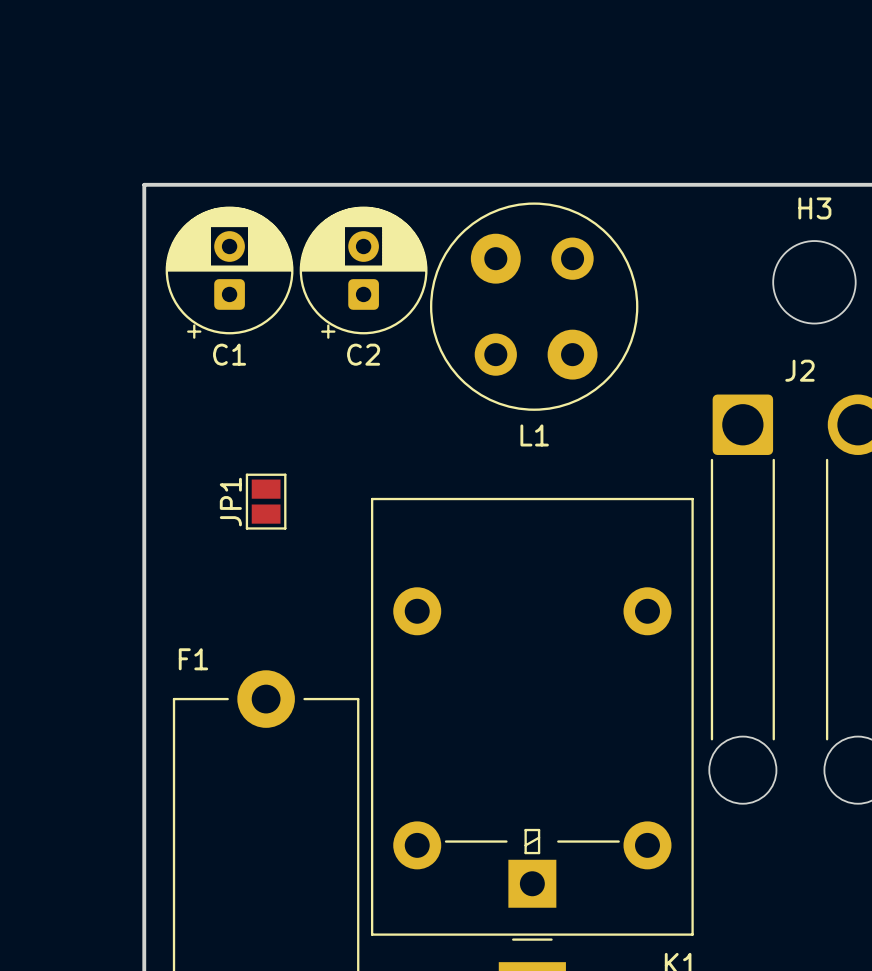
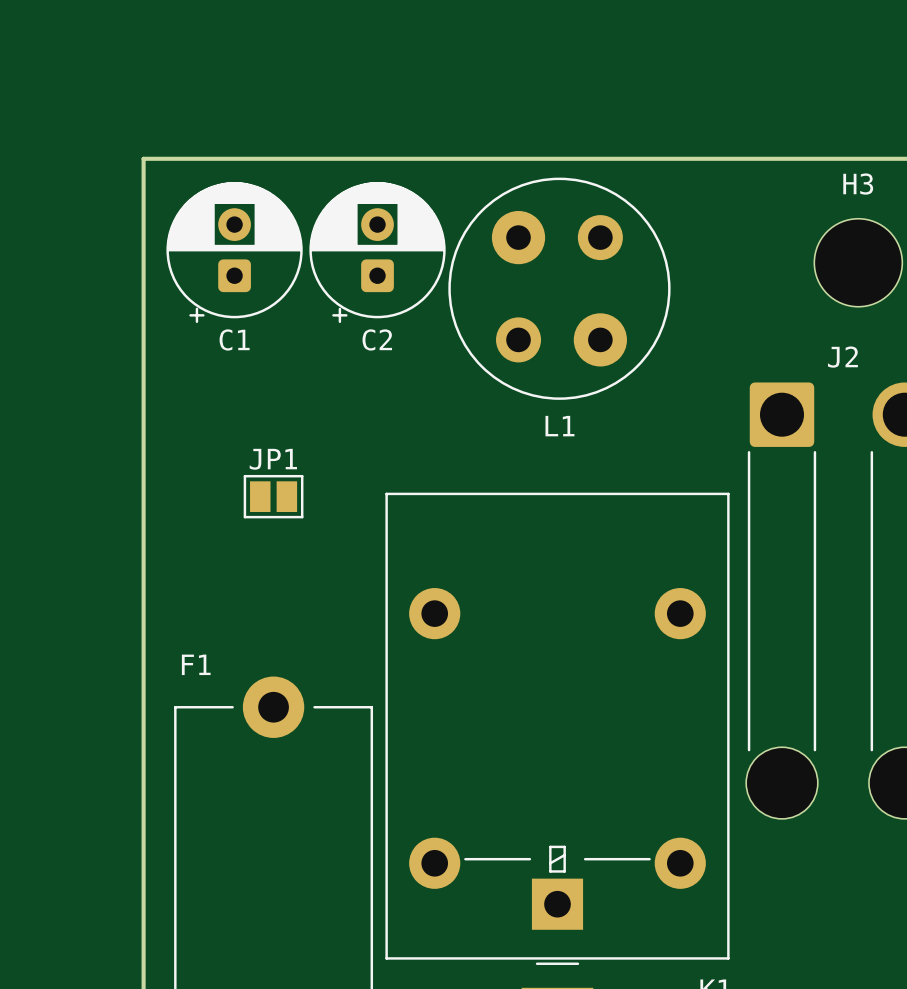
JP1 rotation: 0° (266, 501) -> 90° clockwise (273, 496)

